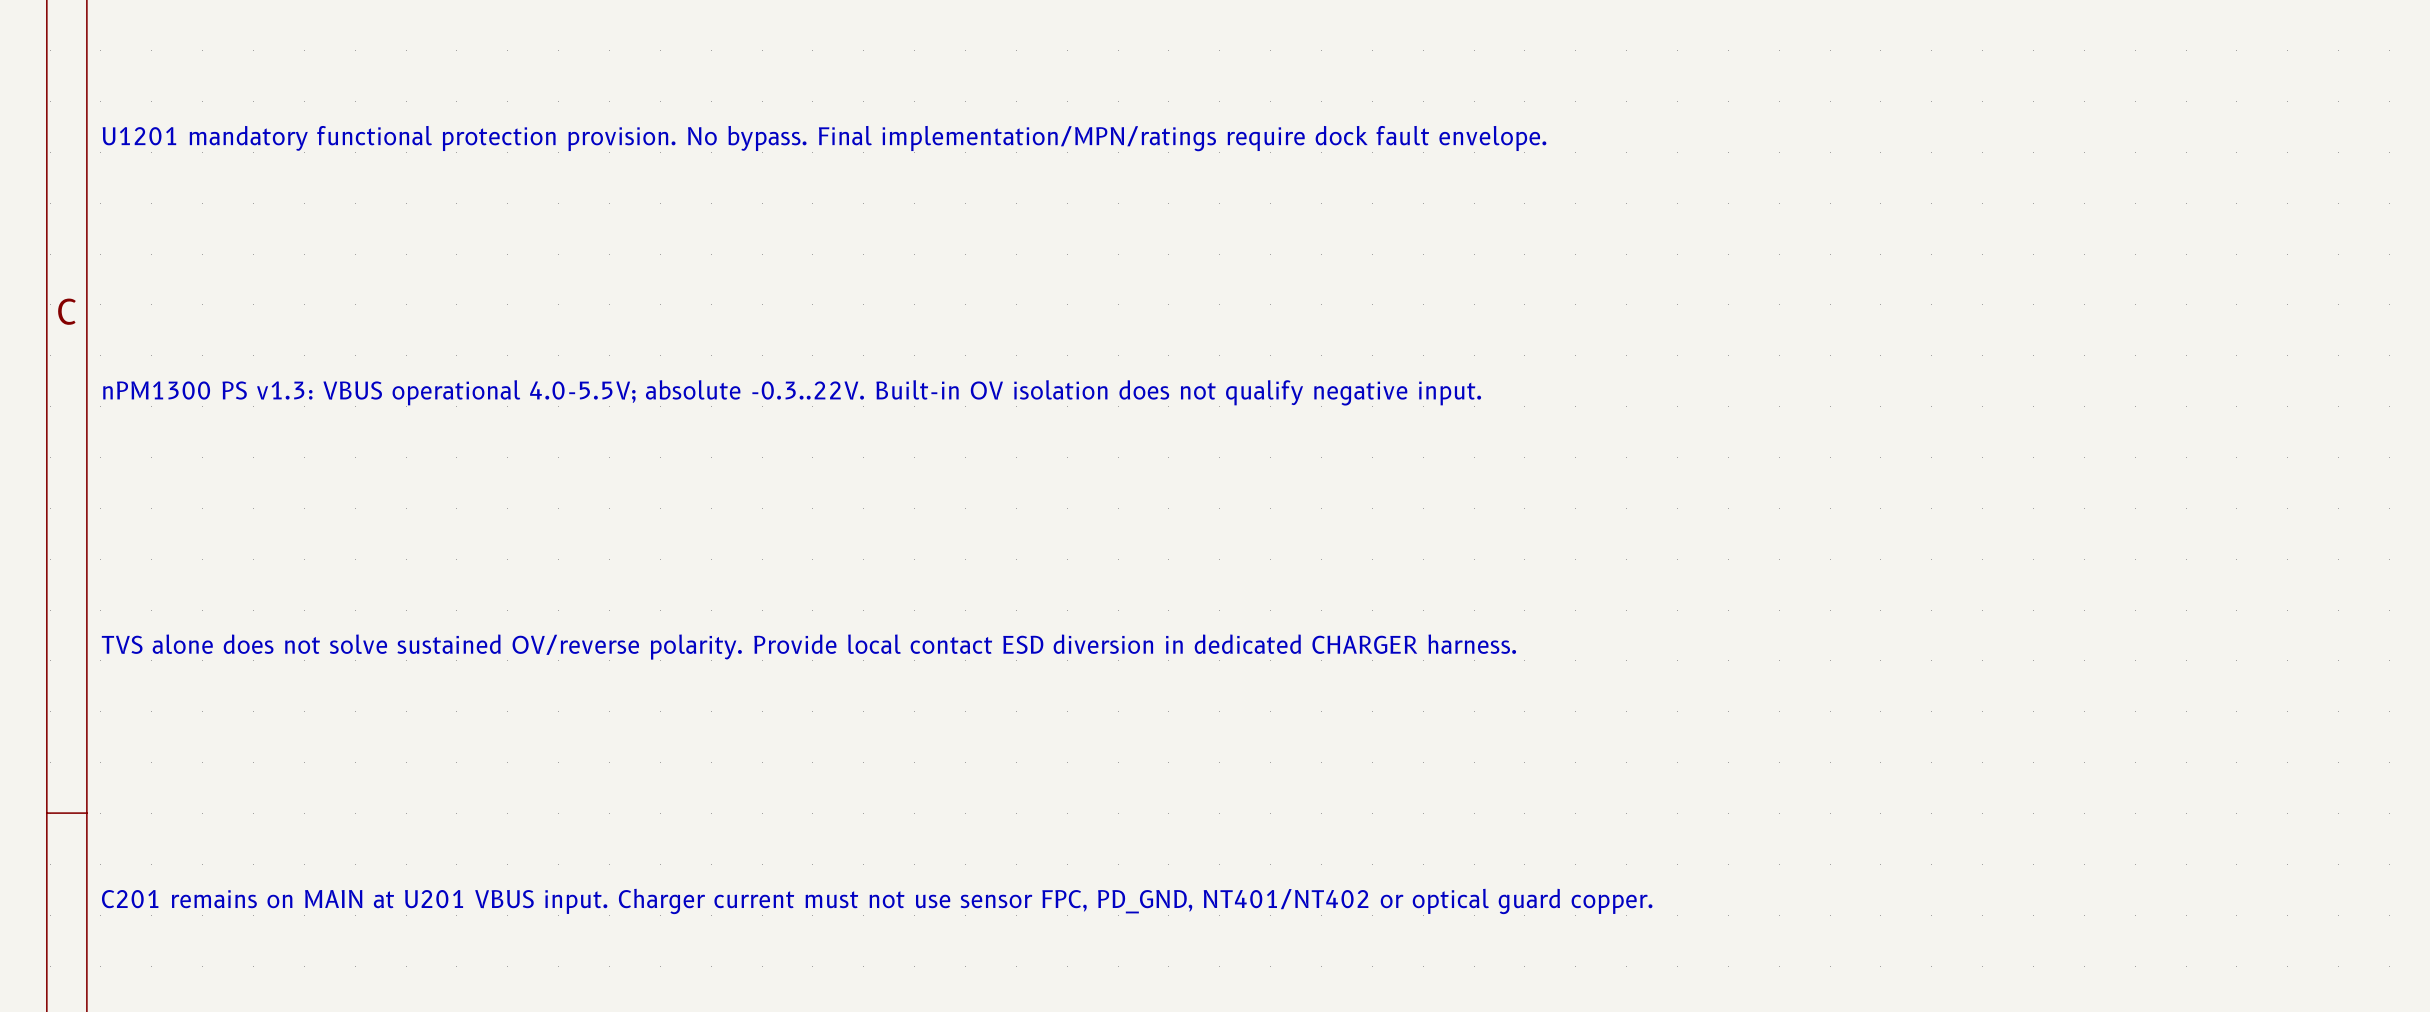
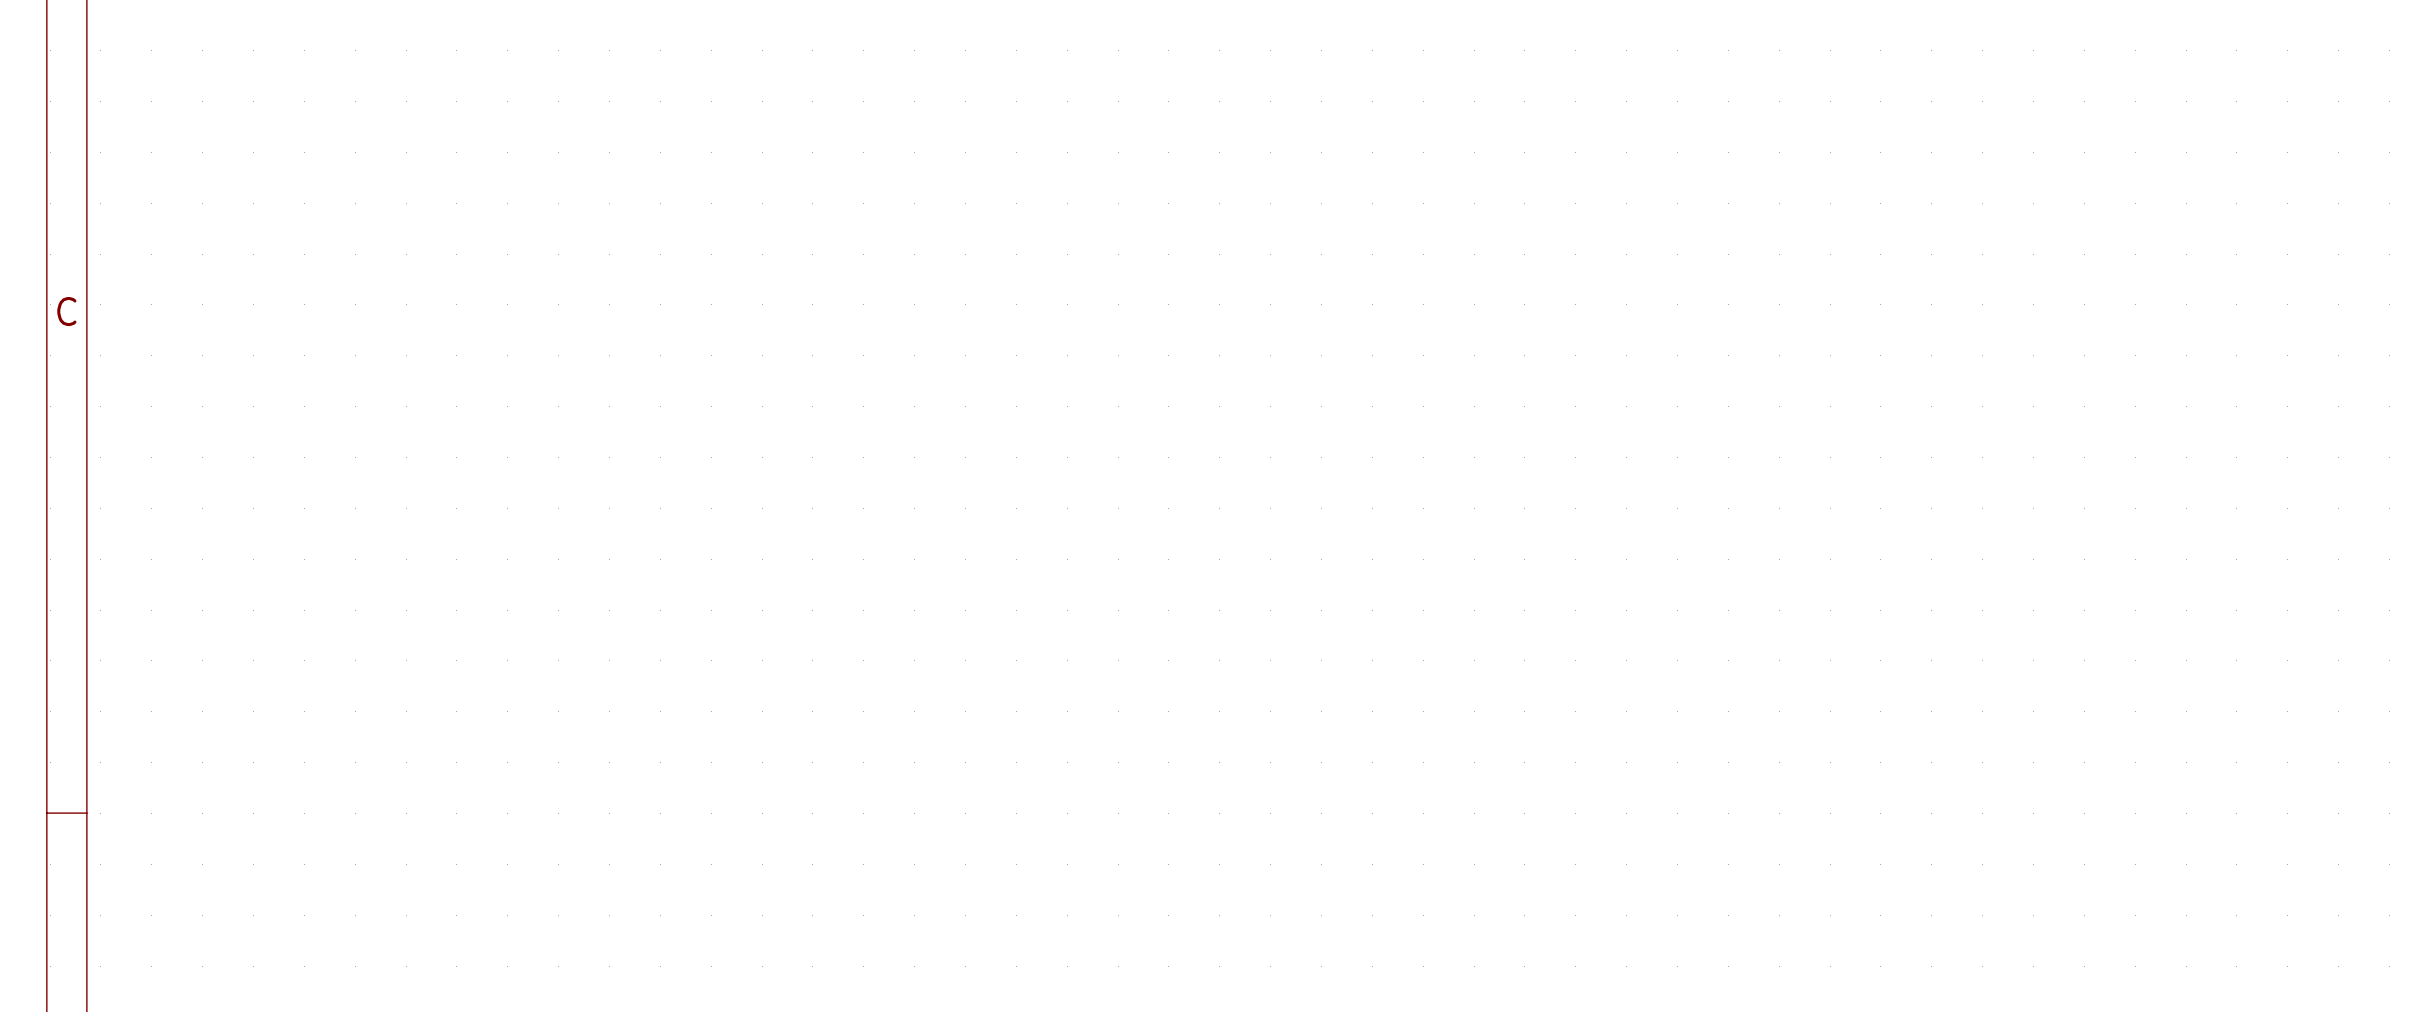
text: U1201 mandatory functional protection provision. No bypass. Final implementation/MPN/ratings require dock fault envelope. (824, 138) -> none
text: nPM1300 PS v1.3: VBUS operational 4.0-5.5V; absolute -0.3..22V. Built-in OV isolation does not qualify negative input. (792, 392) -> none
text: TVS alone does not solve sustained OV/reverse polarity. Provide local contact ESD diversion in dedicated CHARGER harness. (808, 647) -> none
text: C201 remains on MAIN at U201 VBUS input. Charger current must not use sensor FPC, PD_GND, NT401/NT402 or optical guard copper. (877, 901) -> none

